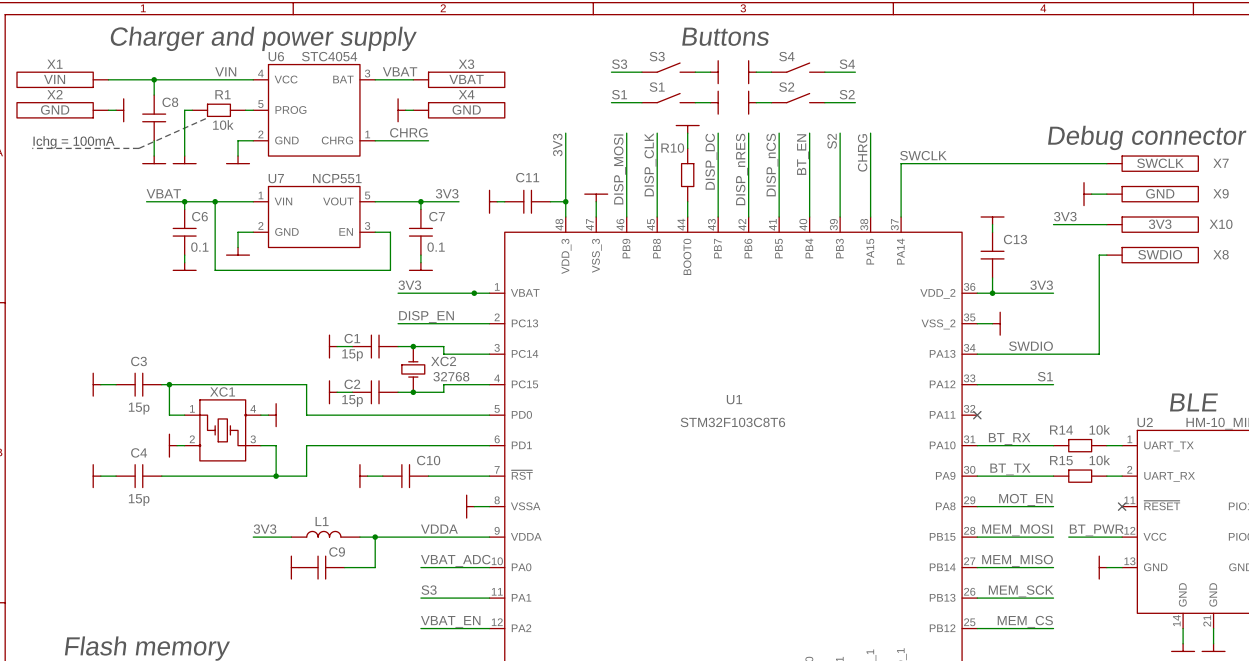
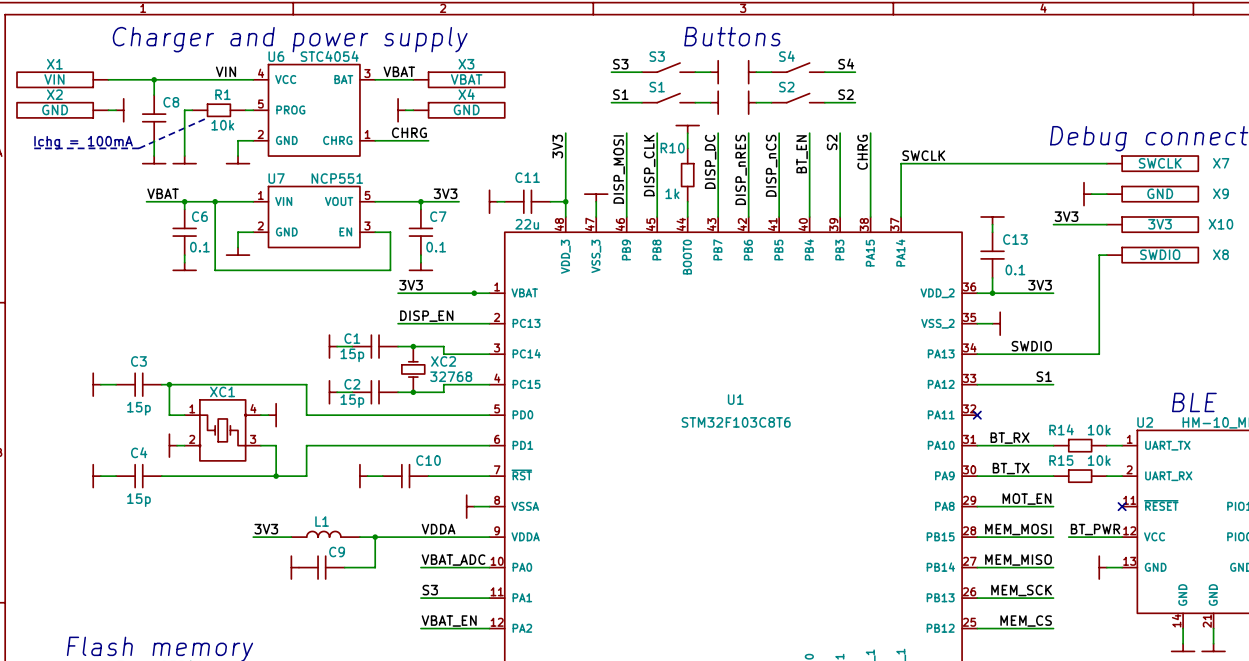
R10 value: none -> 1k (672, 193)
C11 value: none -> 22u (527, 224)
C13 value: none -> 0.1 (1015, 270)

